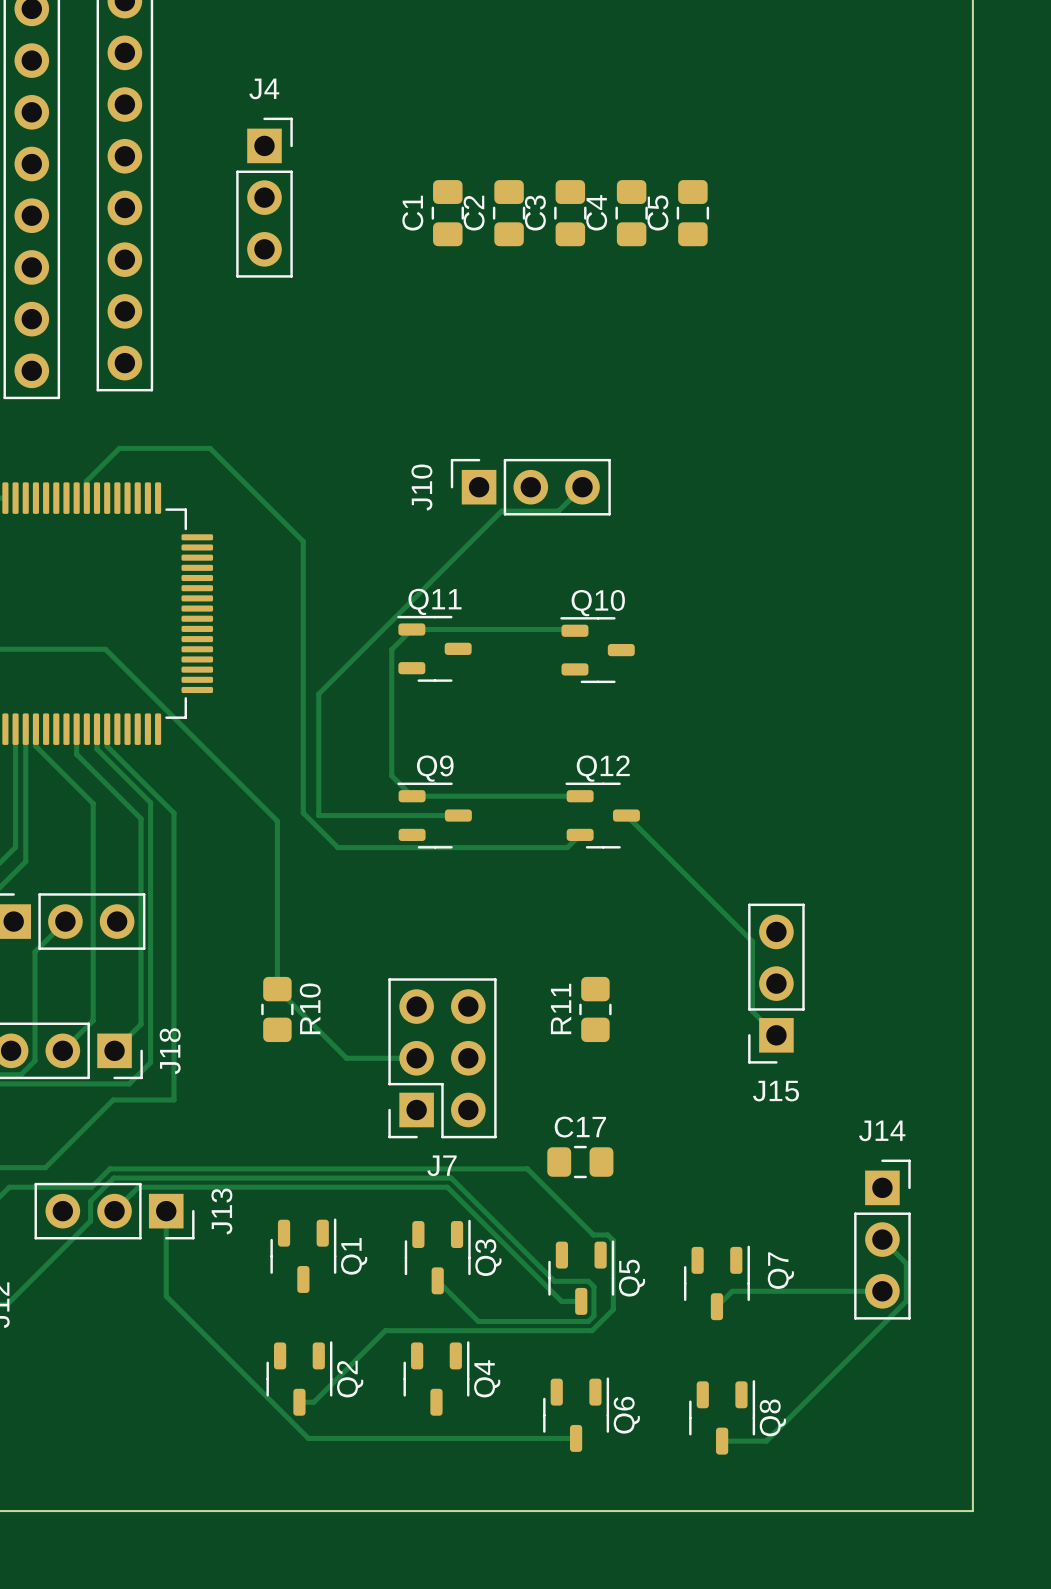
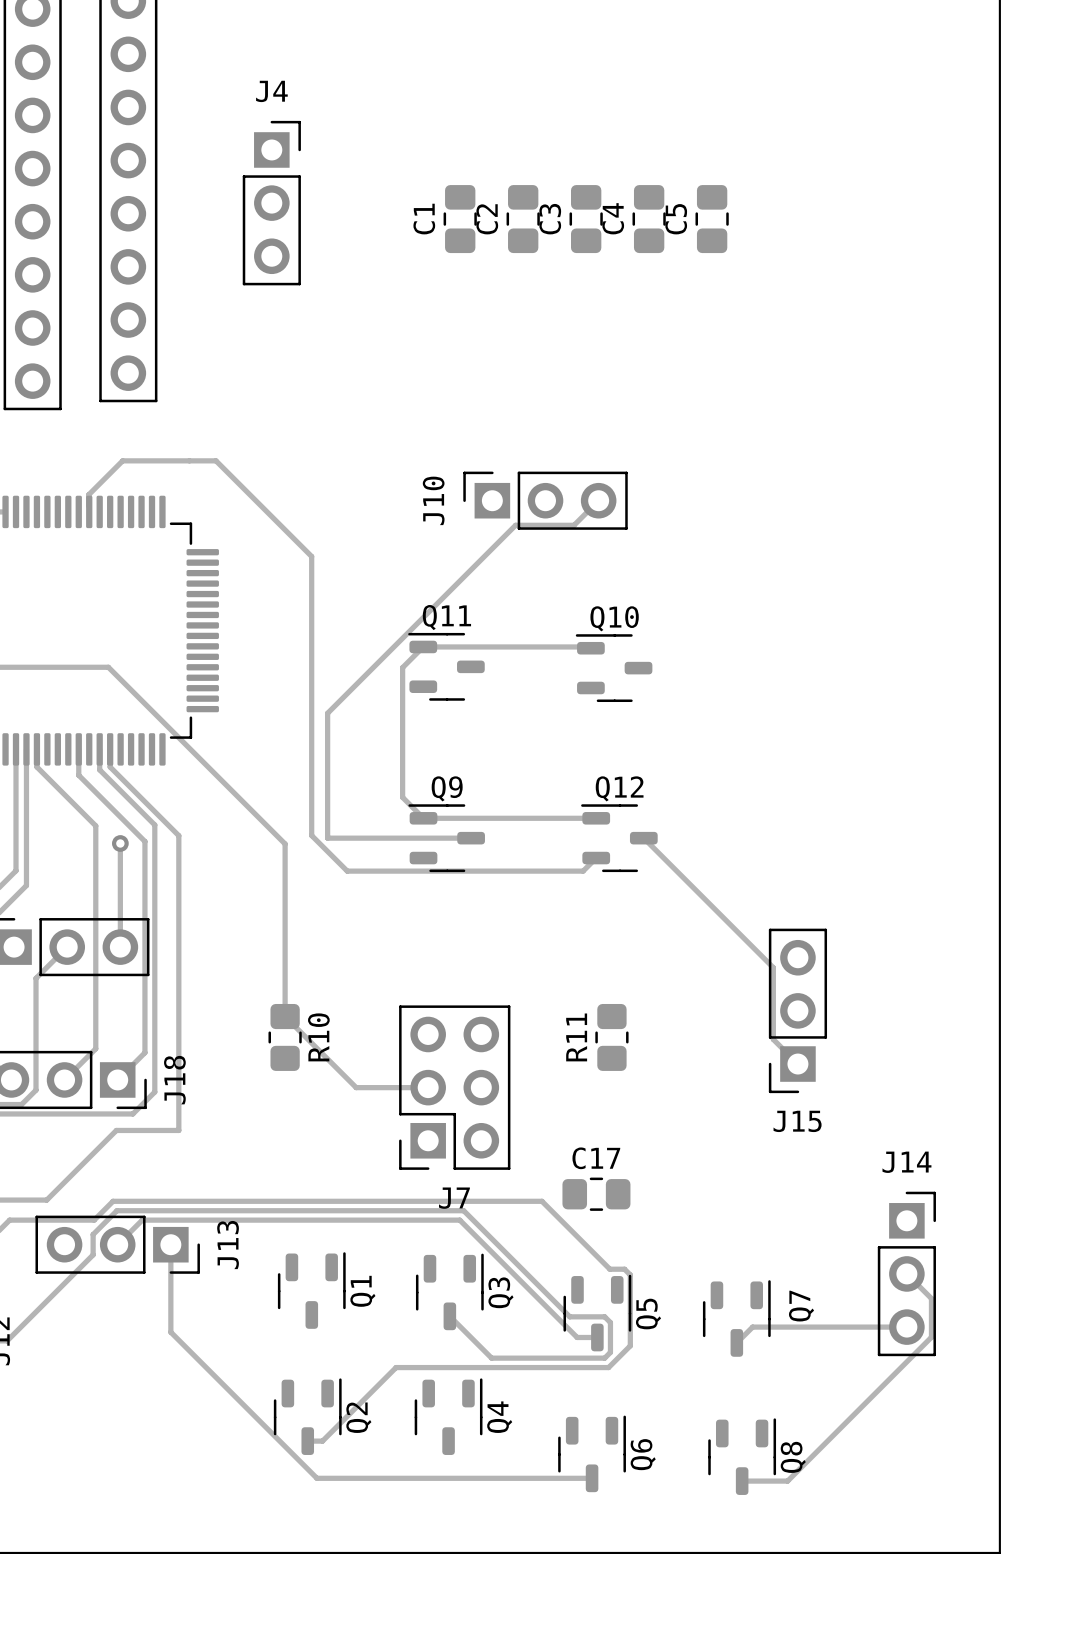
track: none -> (120, 843) (120, 947)
via: none -> (120, 843)

